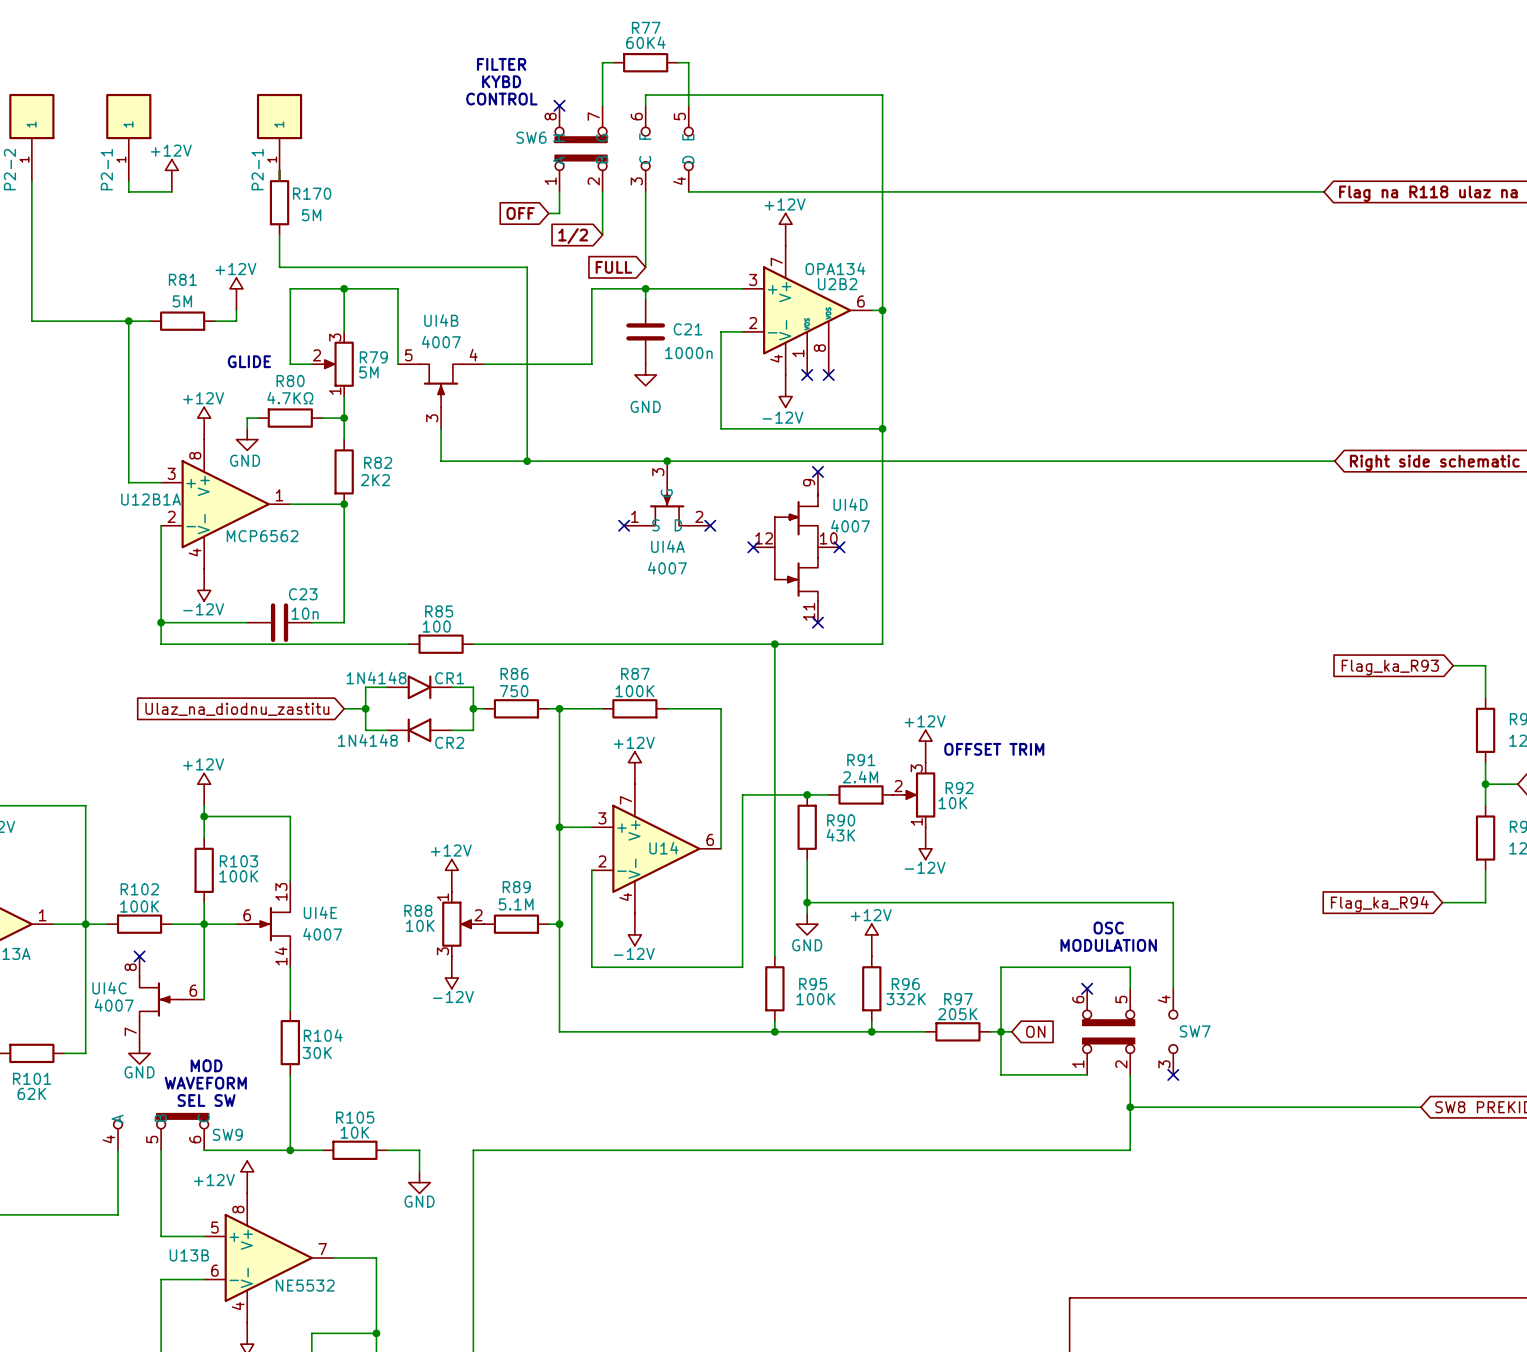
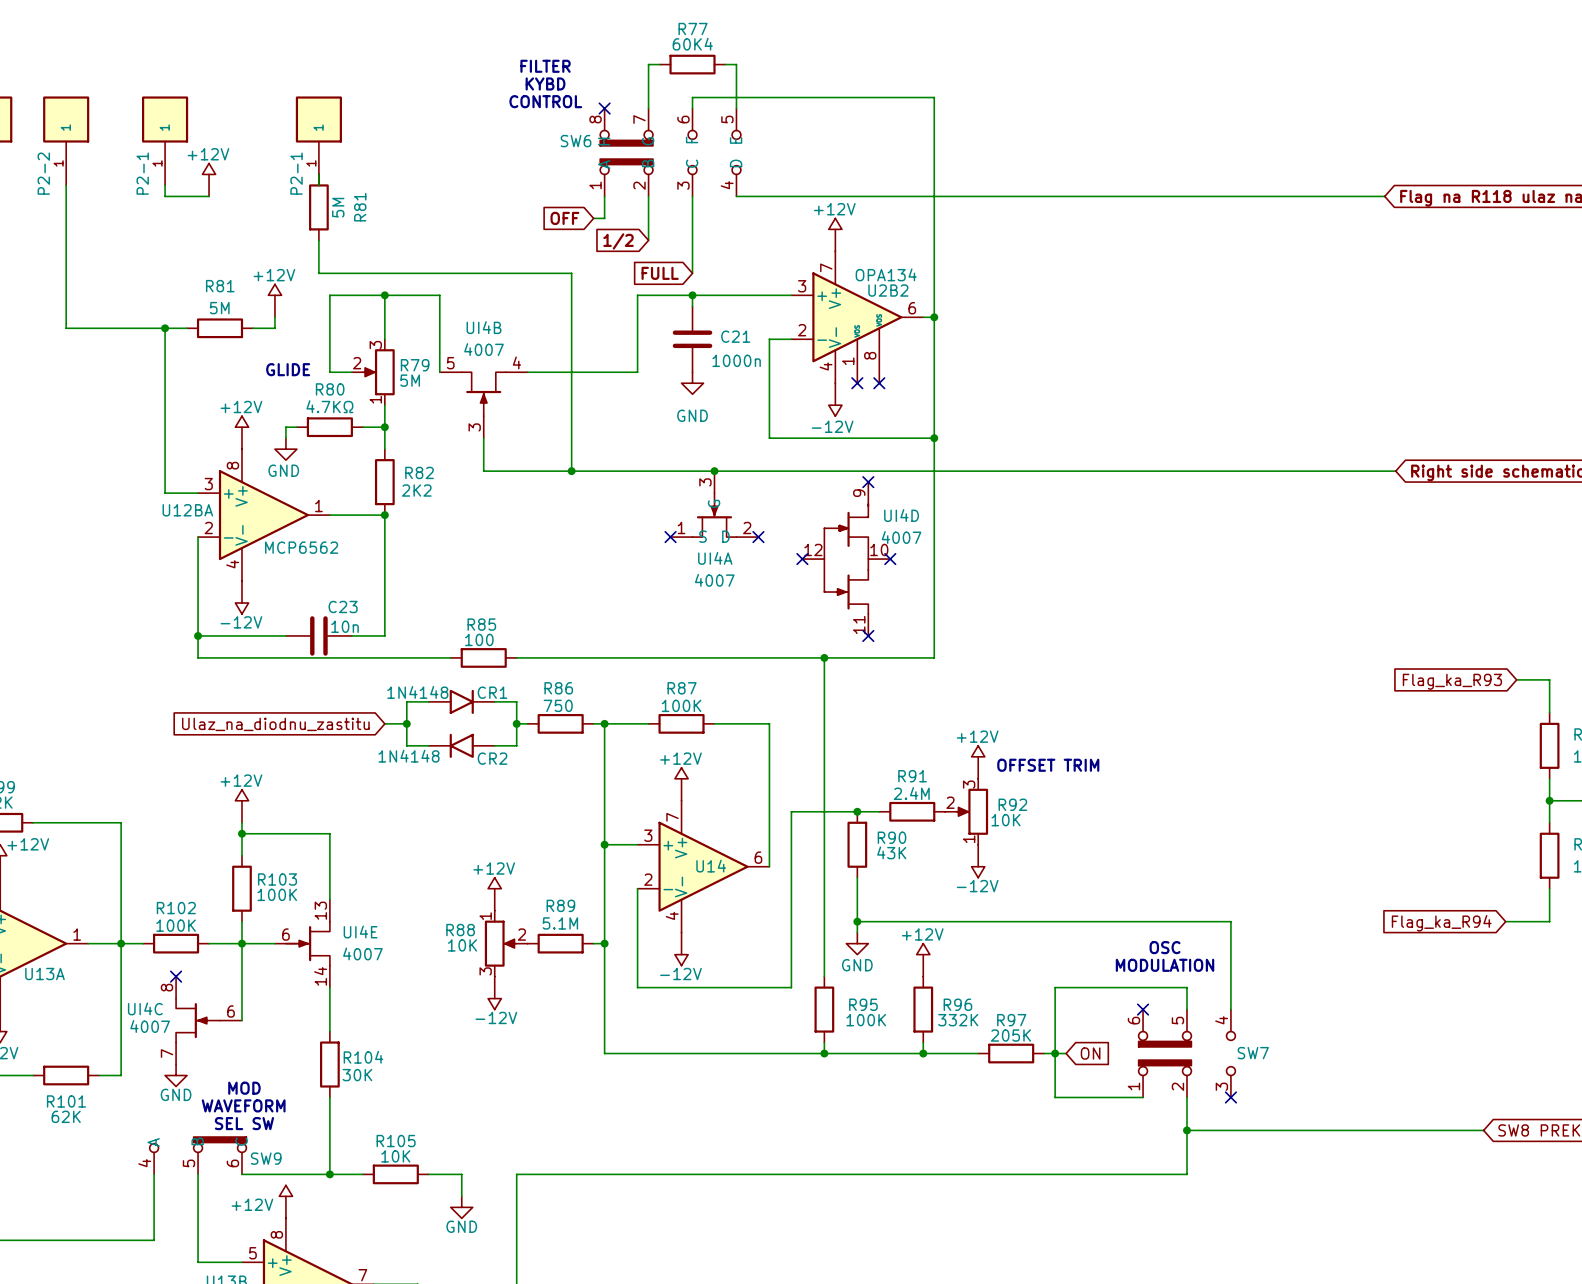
R170 name: R170 (312, 193) -> R81 (360, 207)
R170 value rotation: 0° (311, 215) -> 90° counterclockwise (338, 207)
U12B1A name: U12B1A (151, 499) -> U12BA (187, 510)

